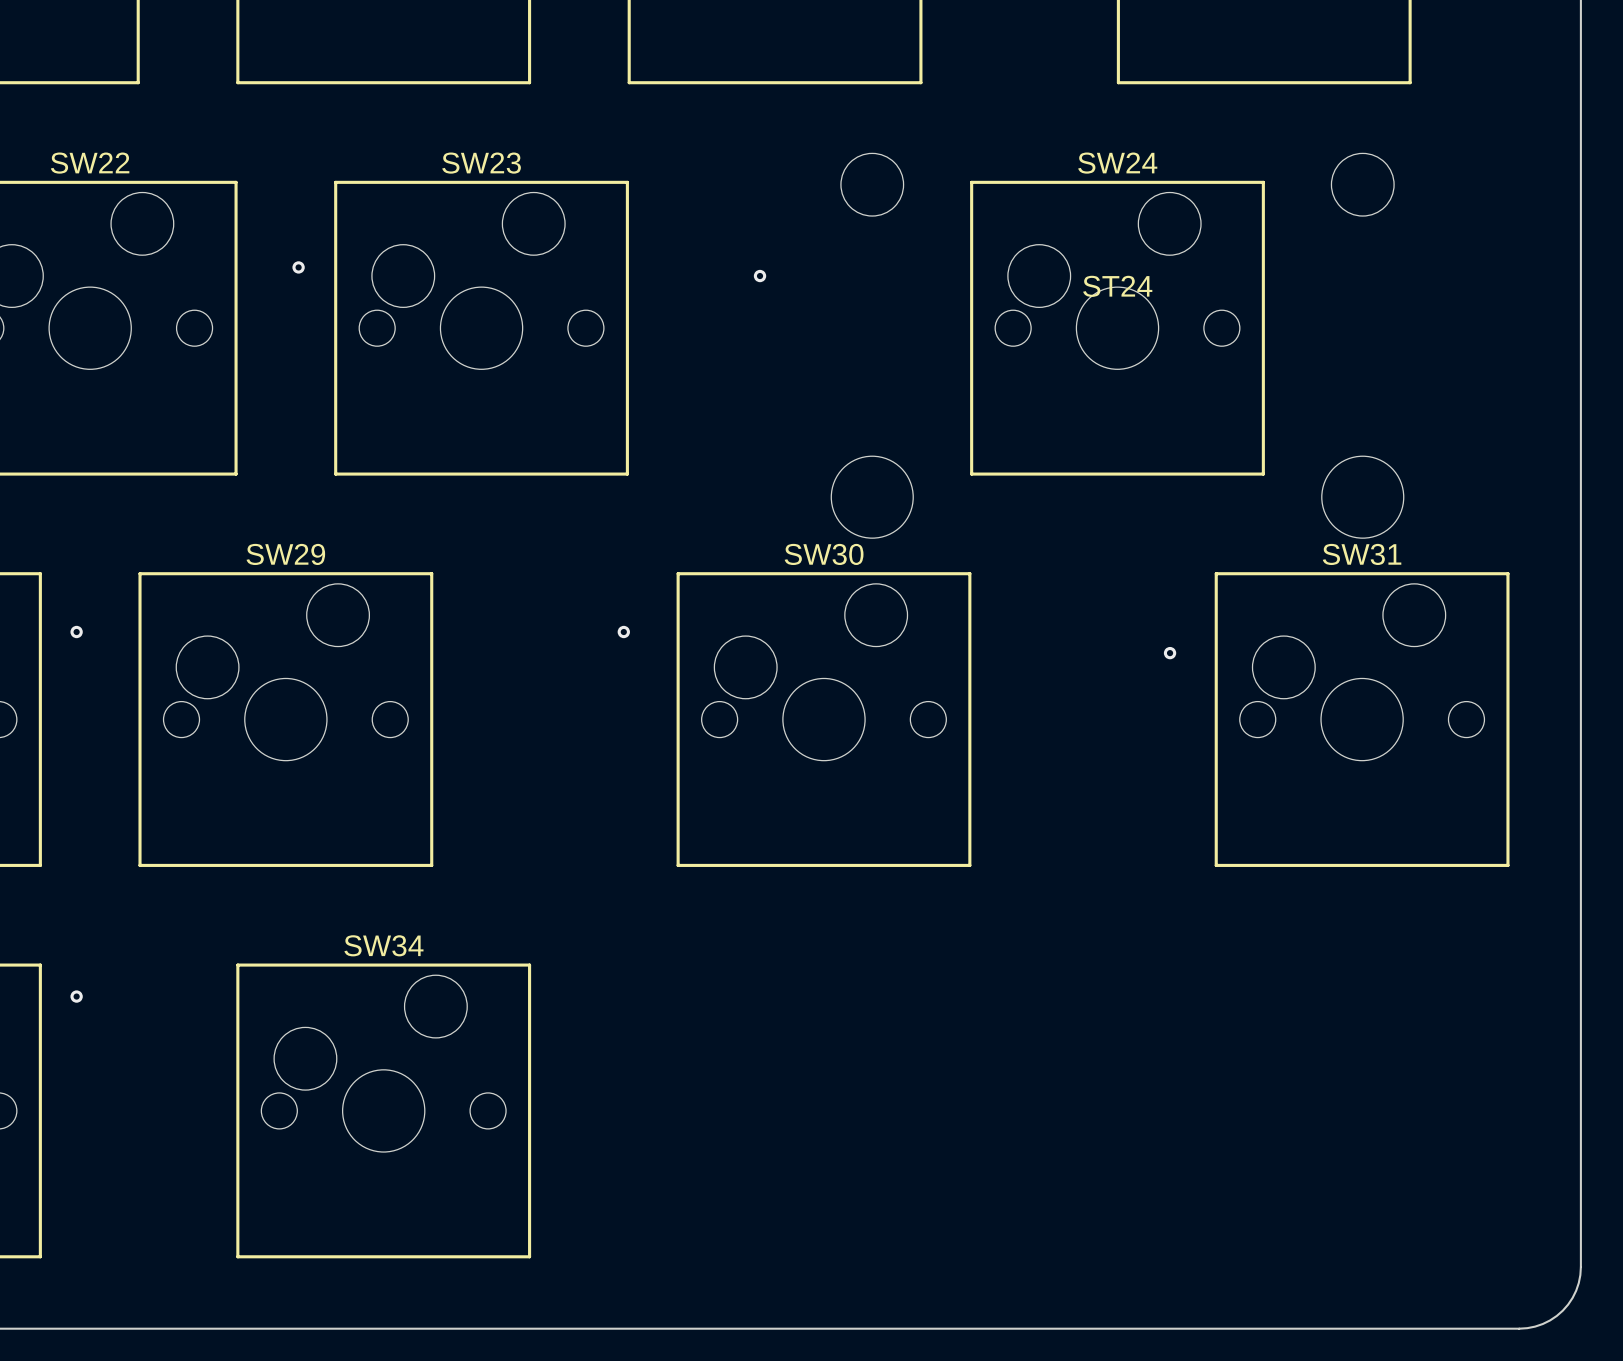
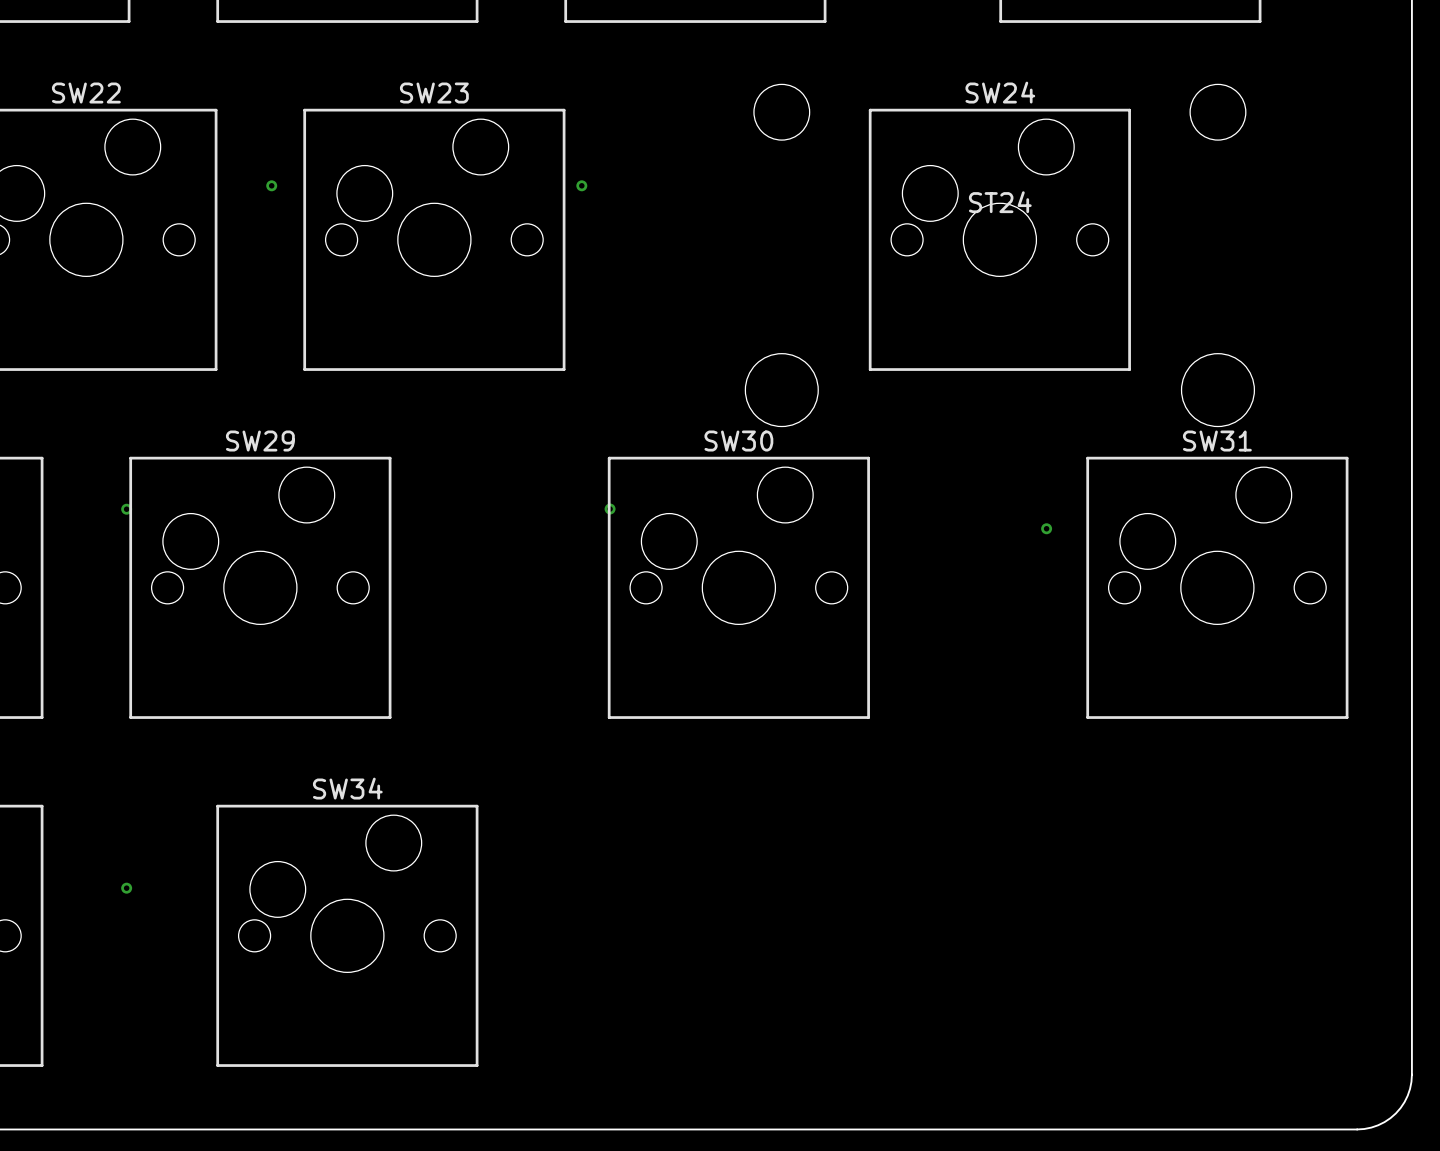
via position: (760, 276) -> (581, 185)
via position: (76, 632) -> (126, 509)
via position: (623, 632) -> (610, 509)
via position: (76, 996) -> (126, 888)

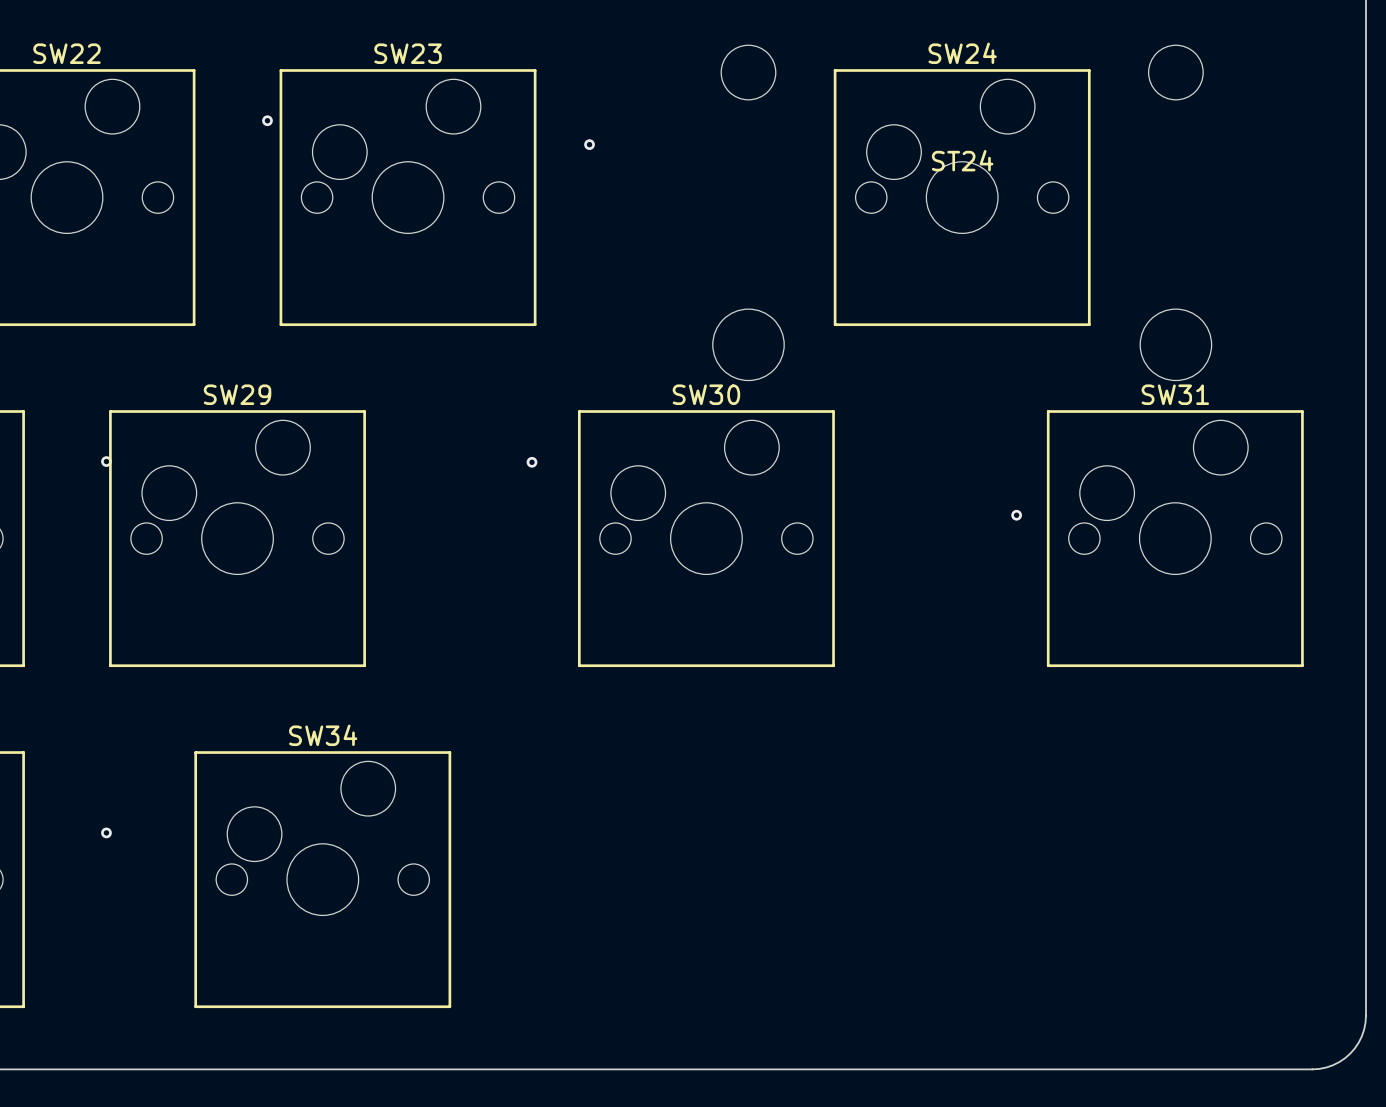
via position: (271, 185) -> (267, 120)
via position: (581, 185) -> (589, 144)
via position: (610, 509) -> (531, 462)
via position: (1046, 528) -> (1016, 515)

